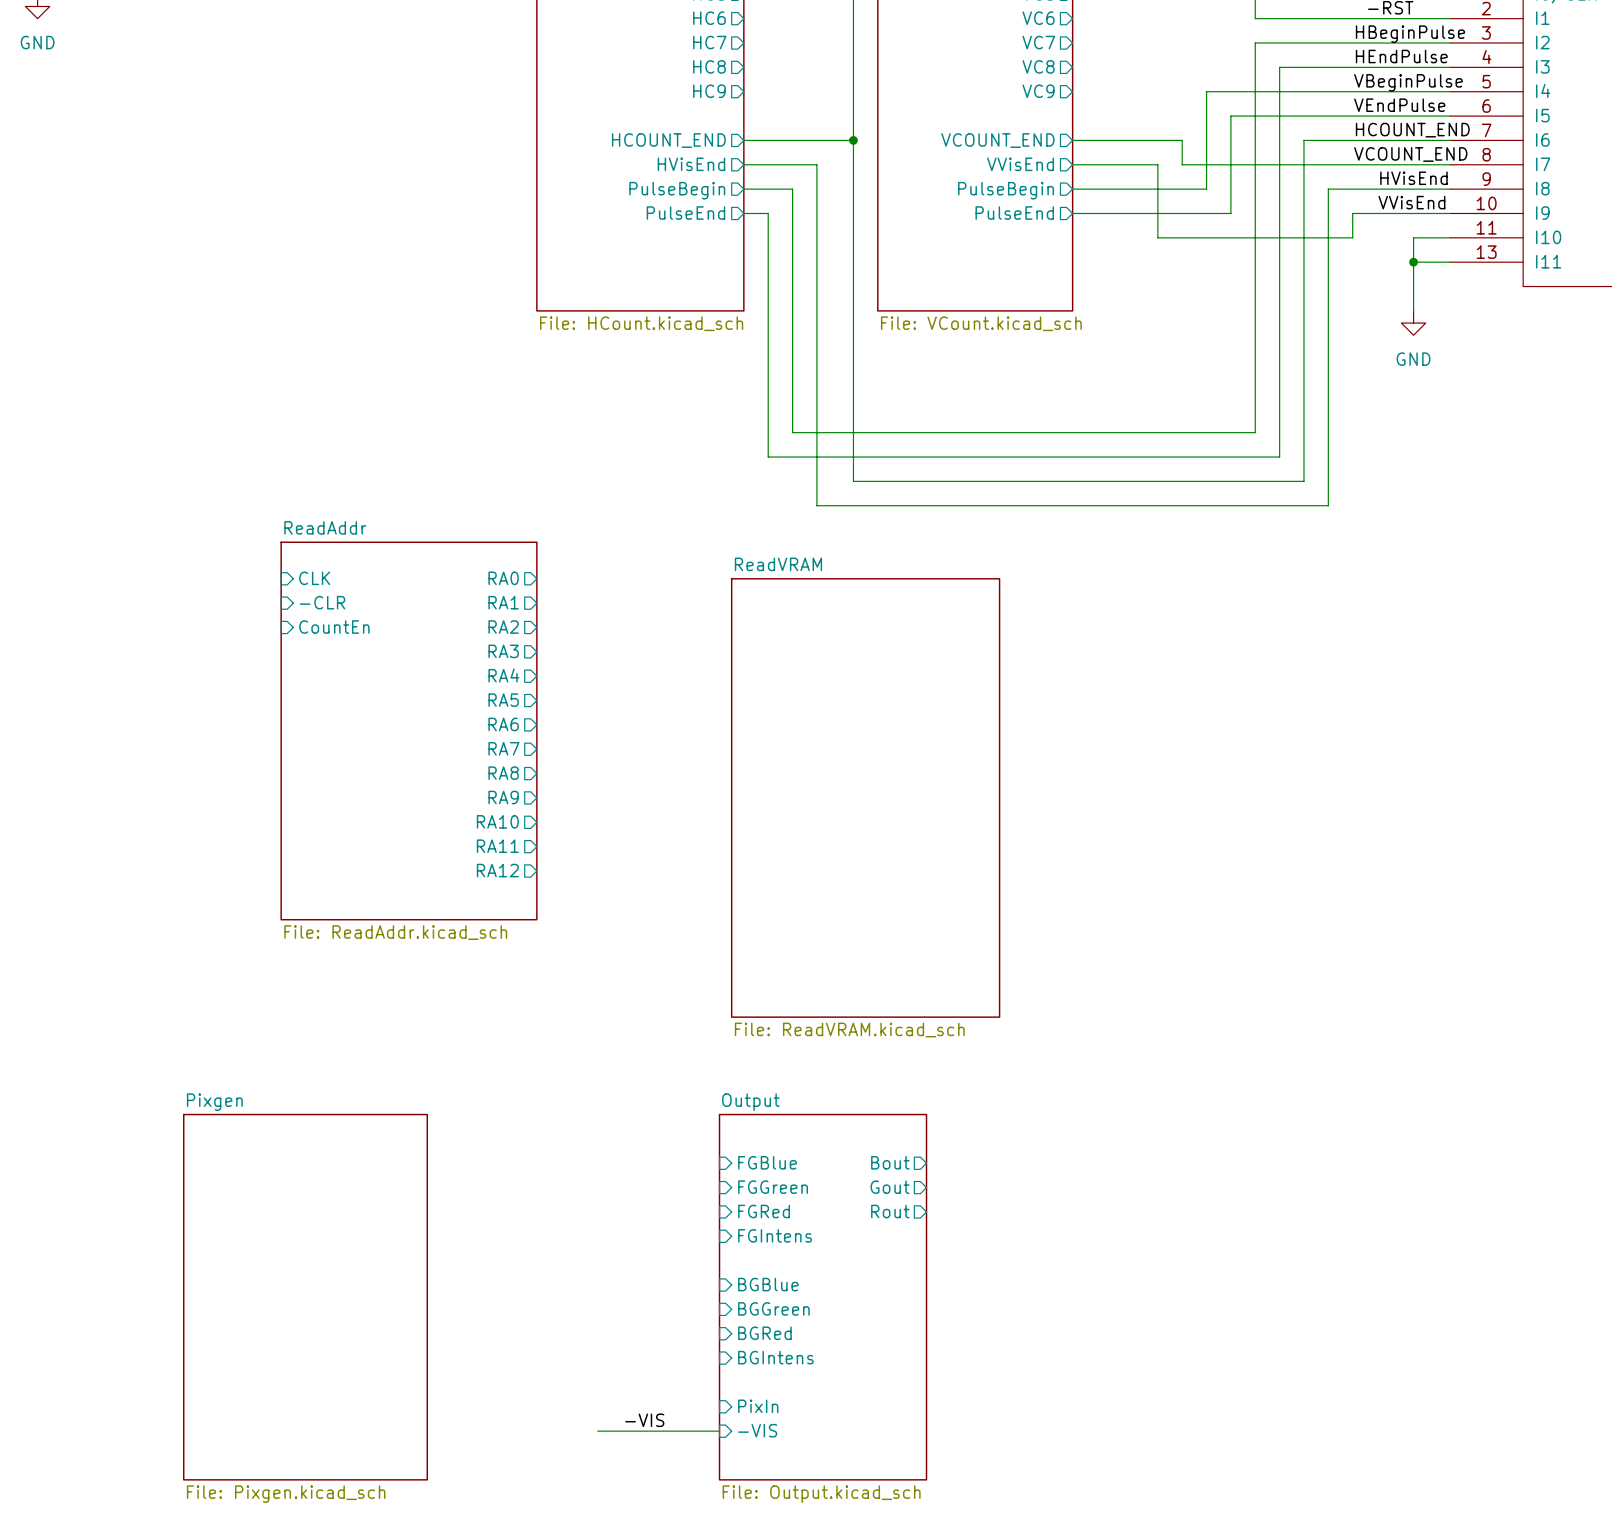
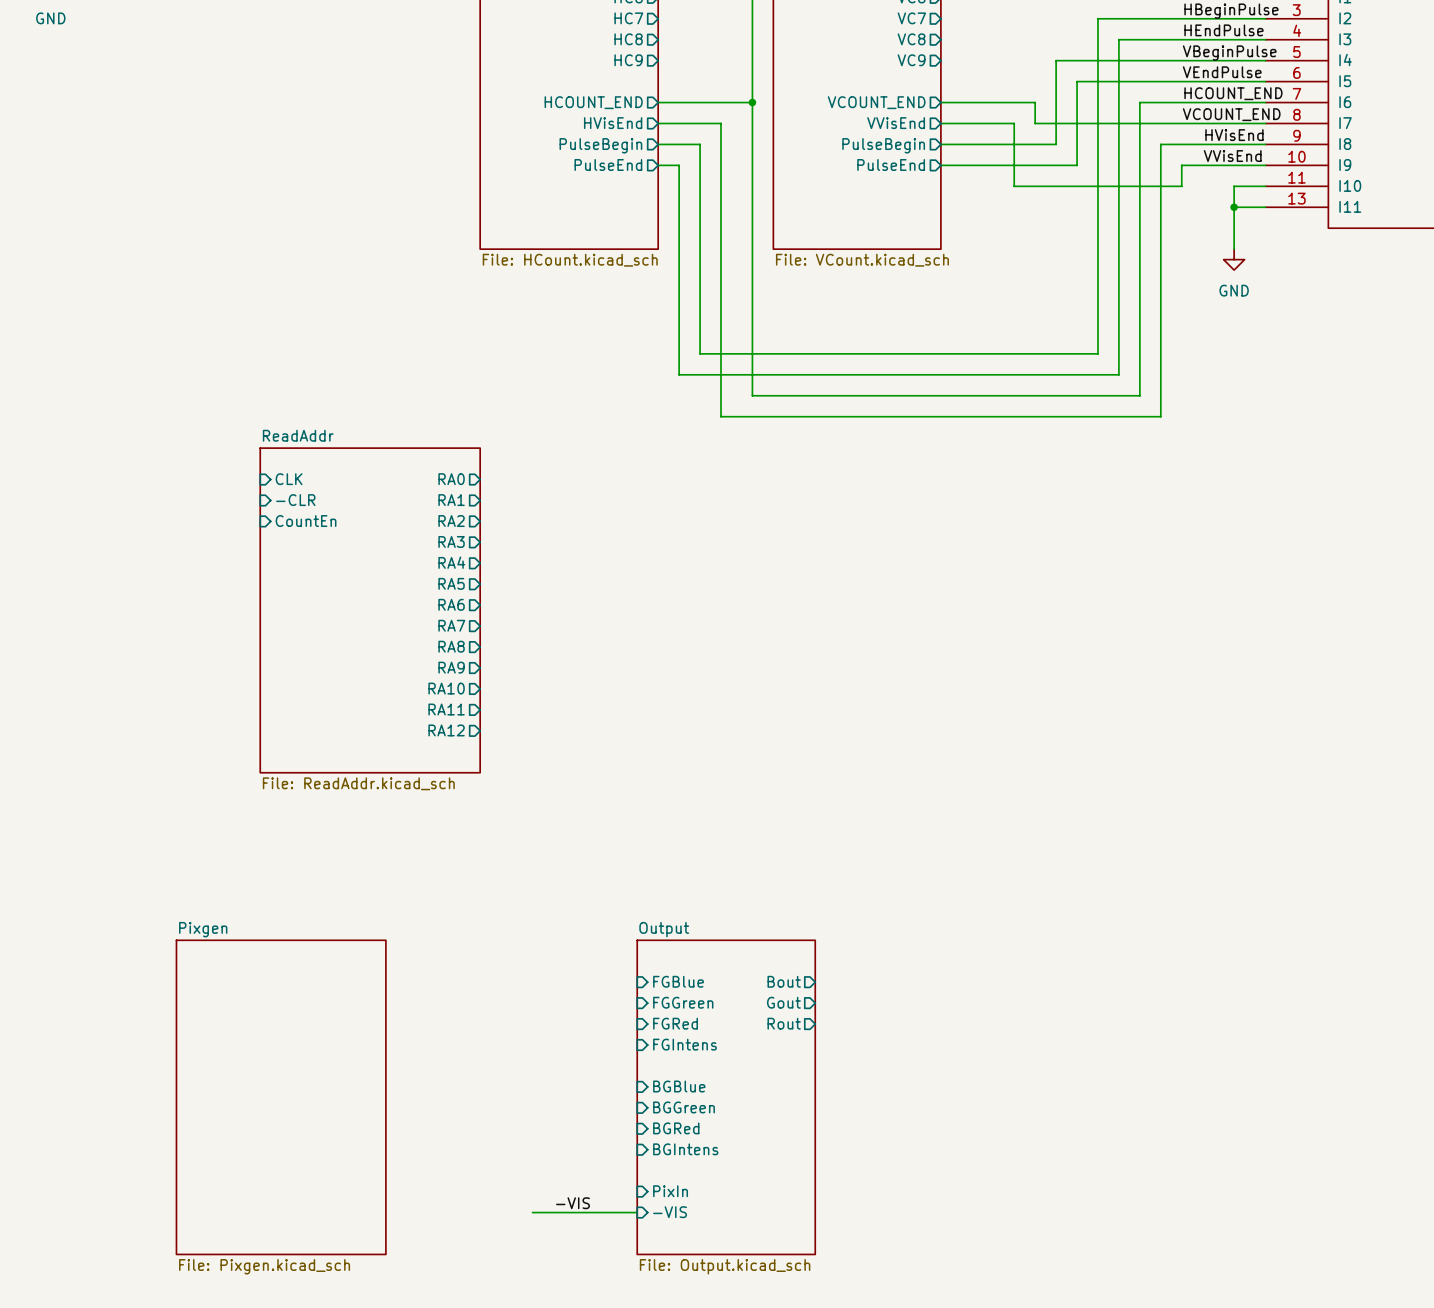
sheet ReadVRAM: File: ReadVRAM.kicad_sch (865, 797) -> none

